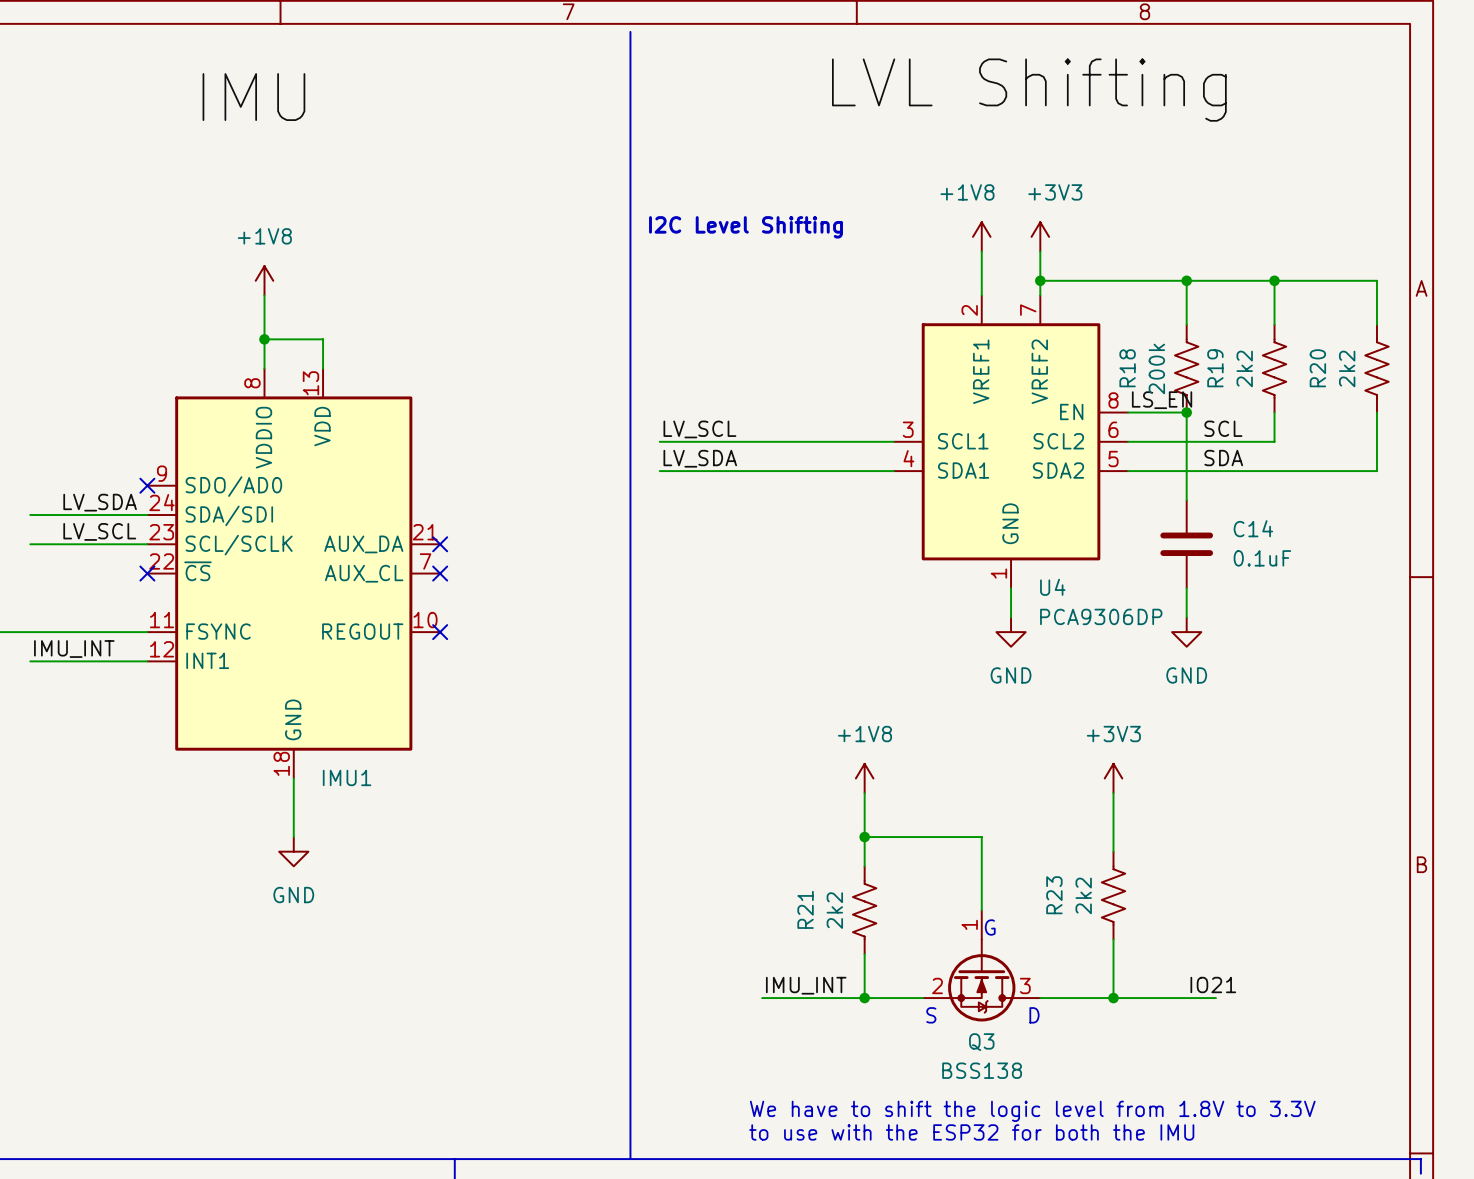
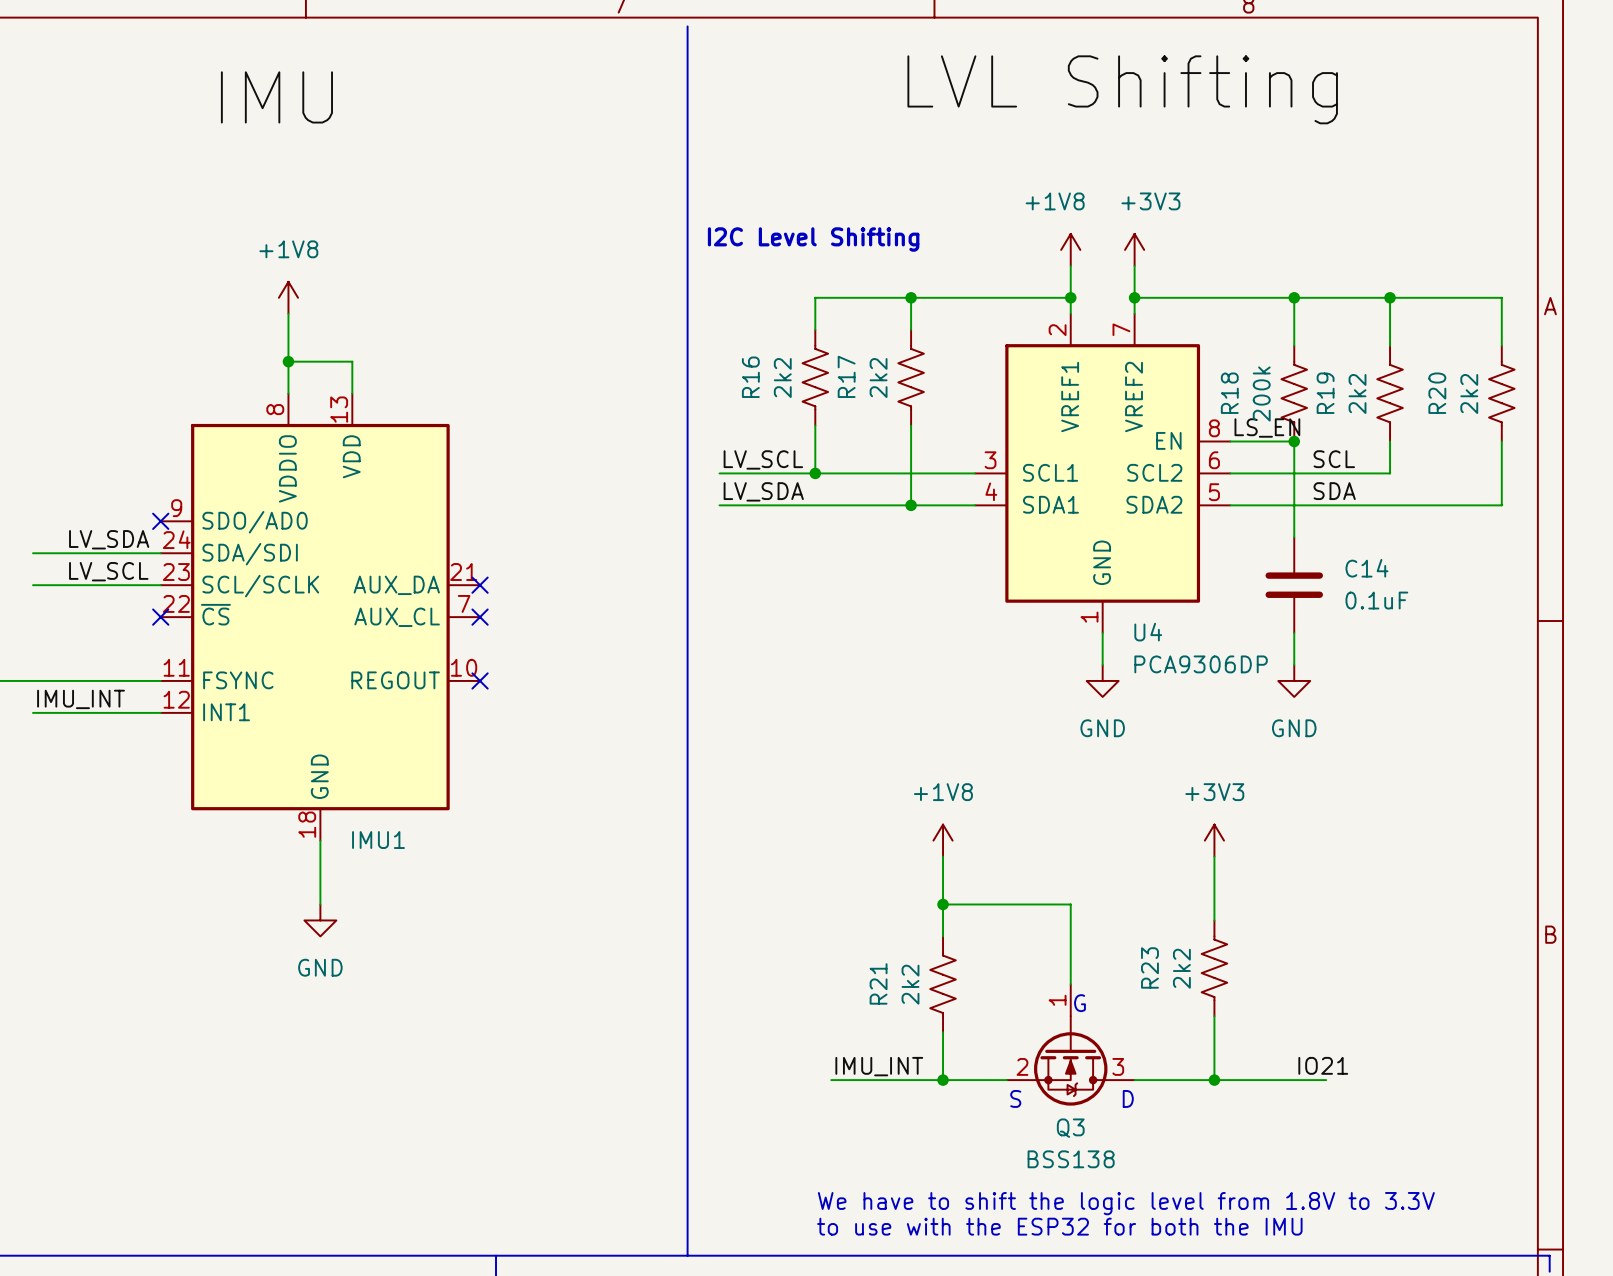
wire: none -> (911, 297) (911, 329)
junction: none -> (911, 297)
wire: none -> (1070, 297) (815, 297) (815, 329)
junction: none -> (1070, 297)
R16: none -> 2k2 (815, 377)
R17: none -> 2k2 (911, 377)
wire: none -> (815, 425) (815, 473)
wire: none -> (911, 425) (911, 505)
junction: none -> (815, 473)
junction: none -> (911, 505)

